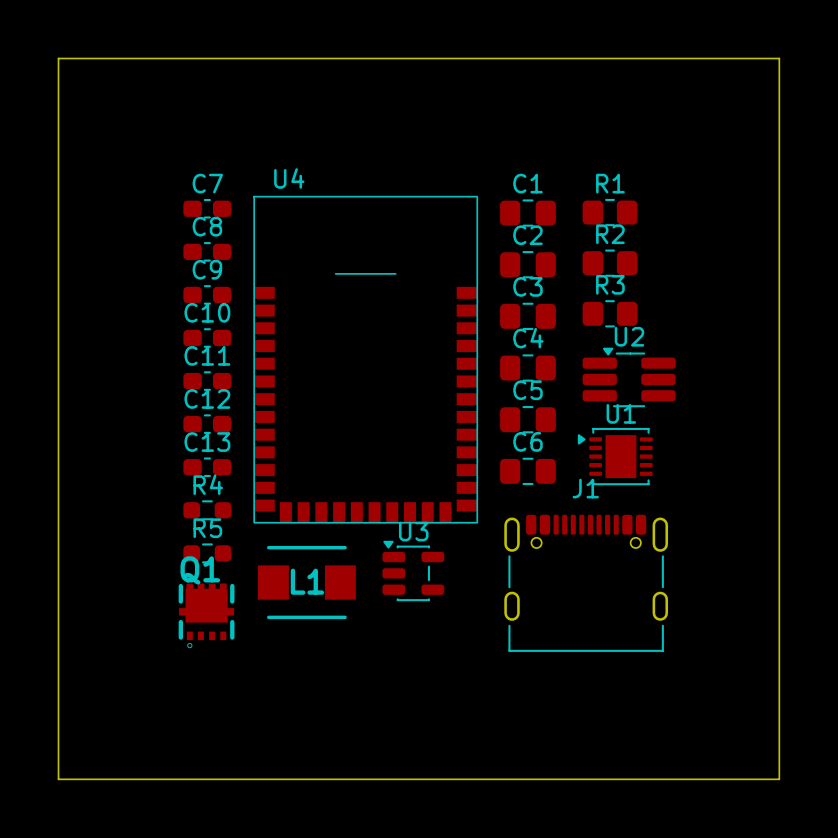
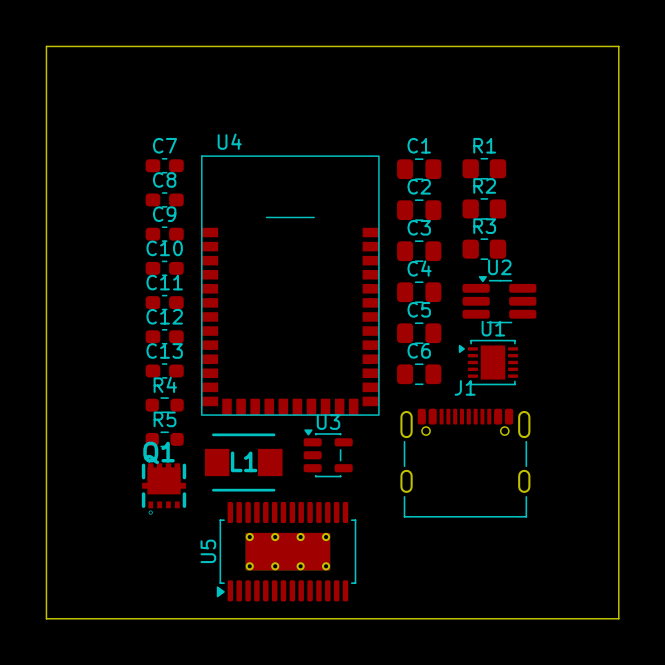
U5: none -> (286, 551)

